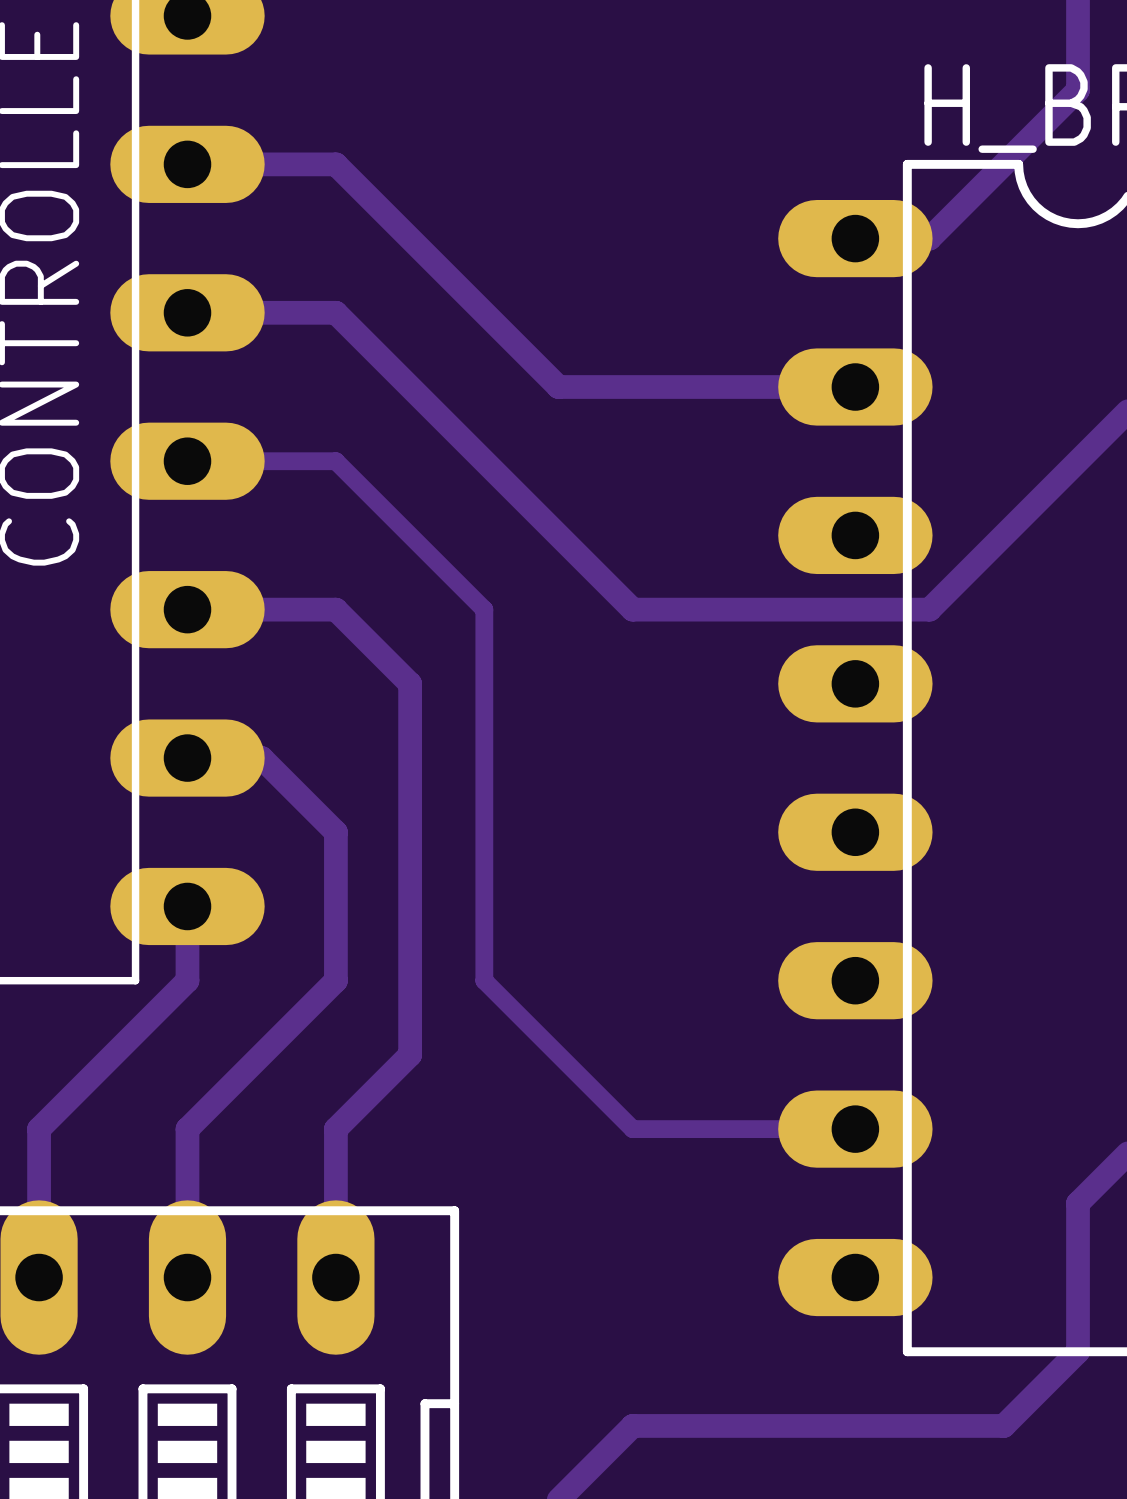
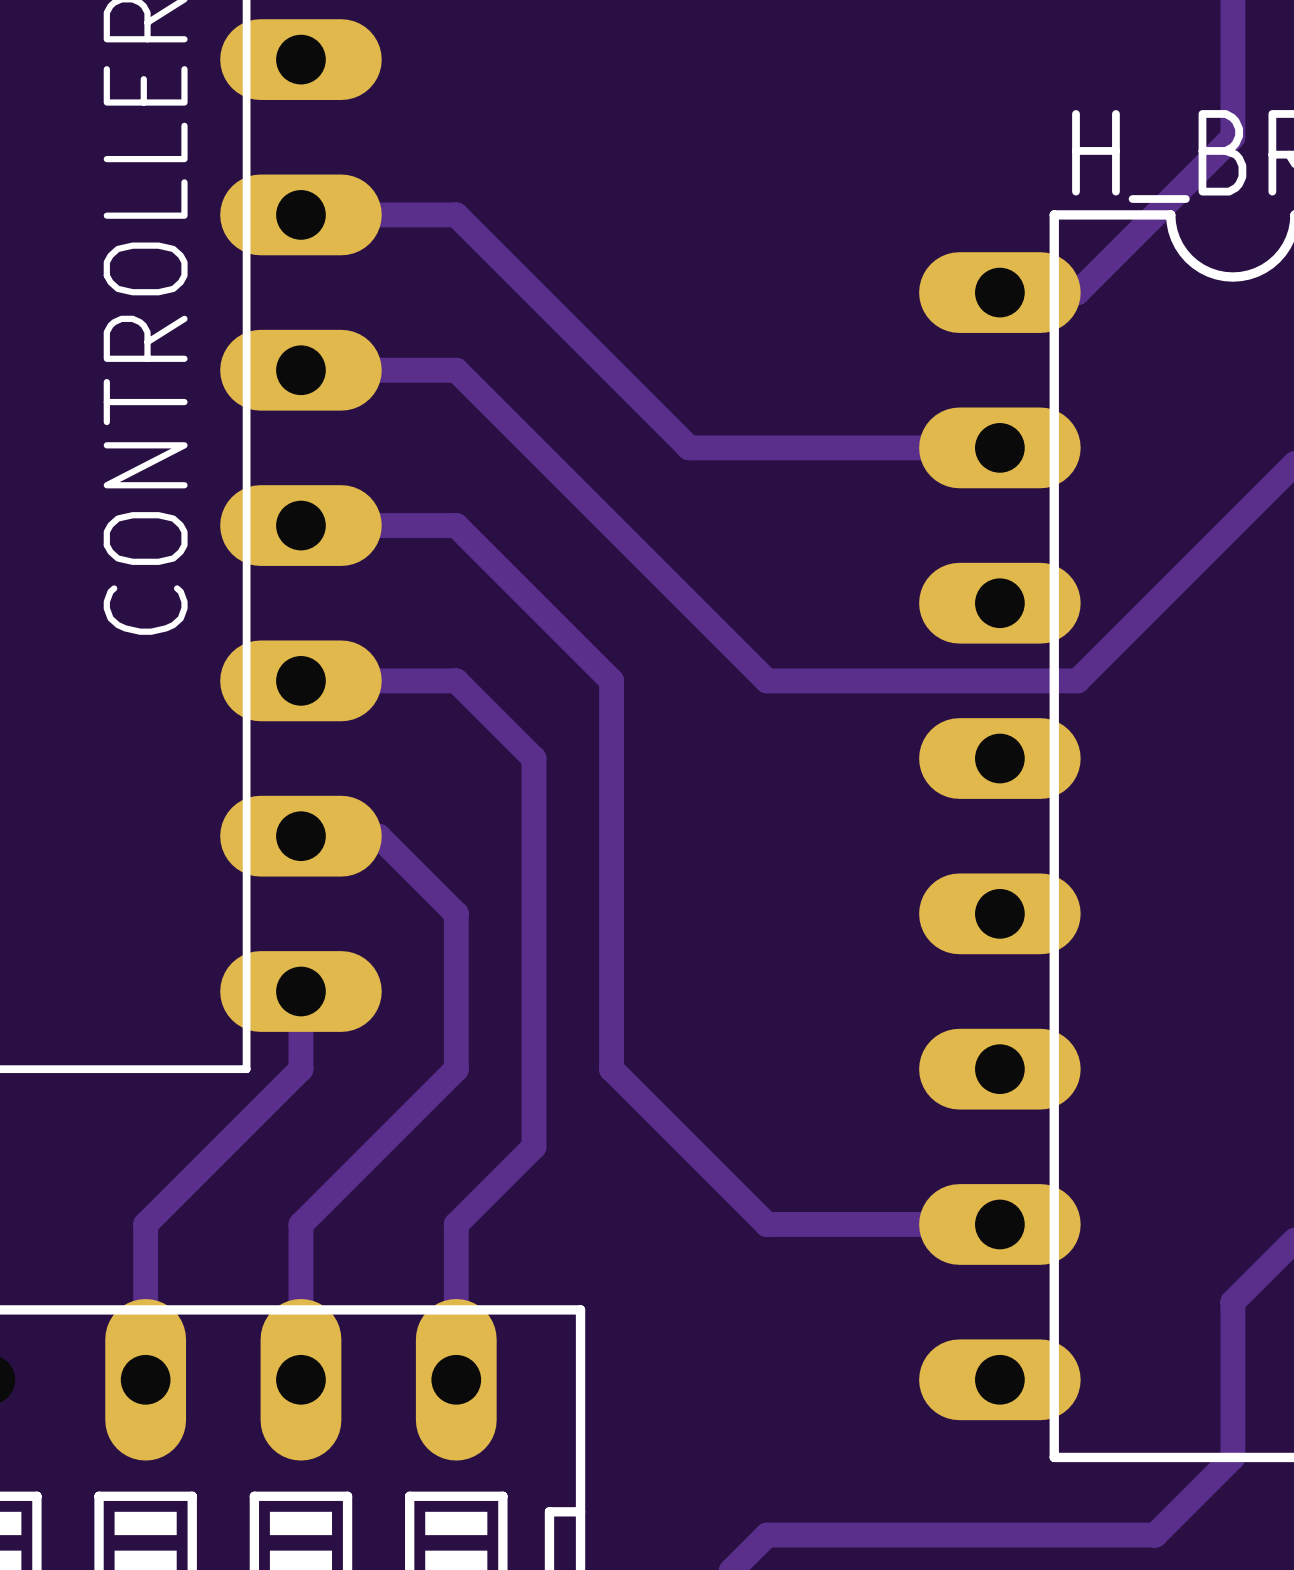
track width: thin (187, 461) (335, 461) (484, 609) (484, 980) (632, 1129) (855, 1129) -> thick (300, 525) (456, 525) (611, 680) (611, 1069) (766, 1224) (999, 1224)

